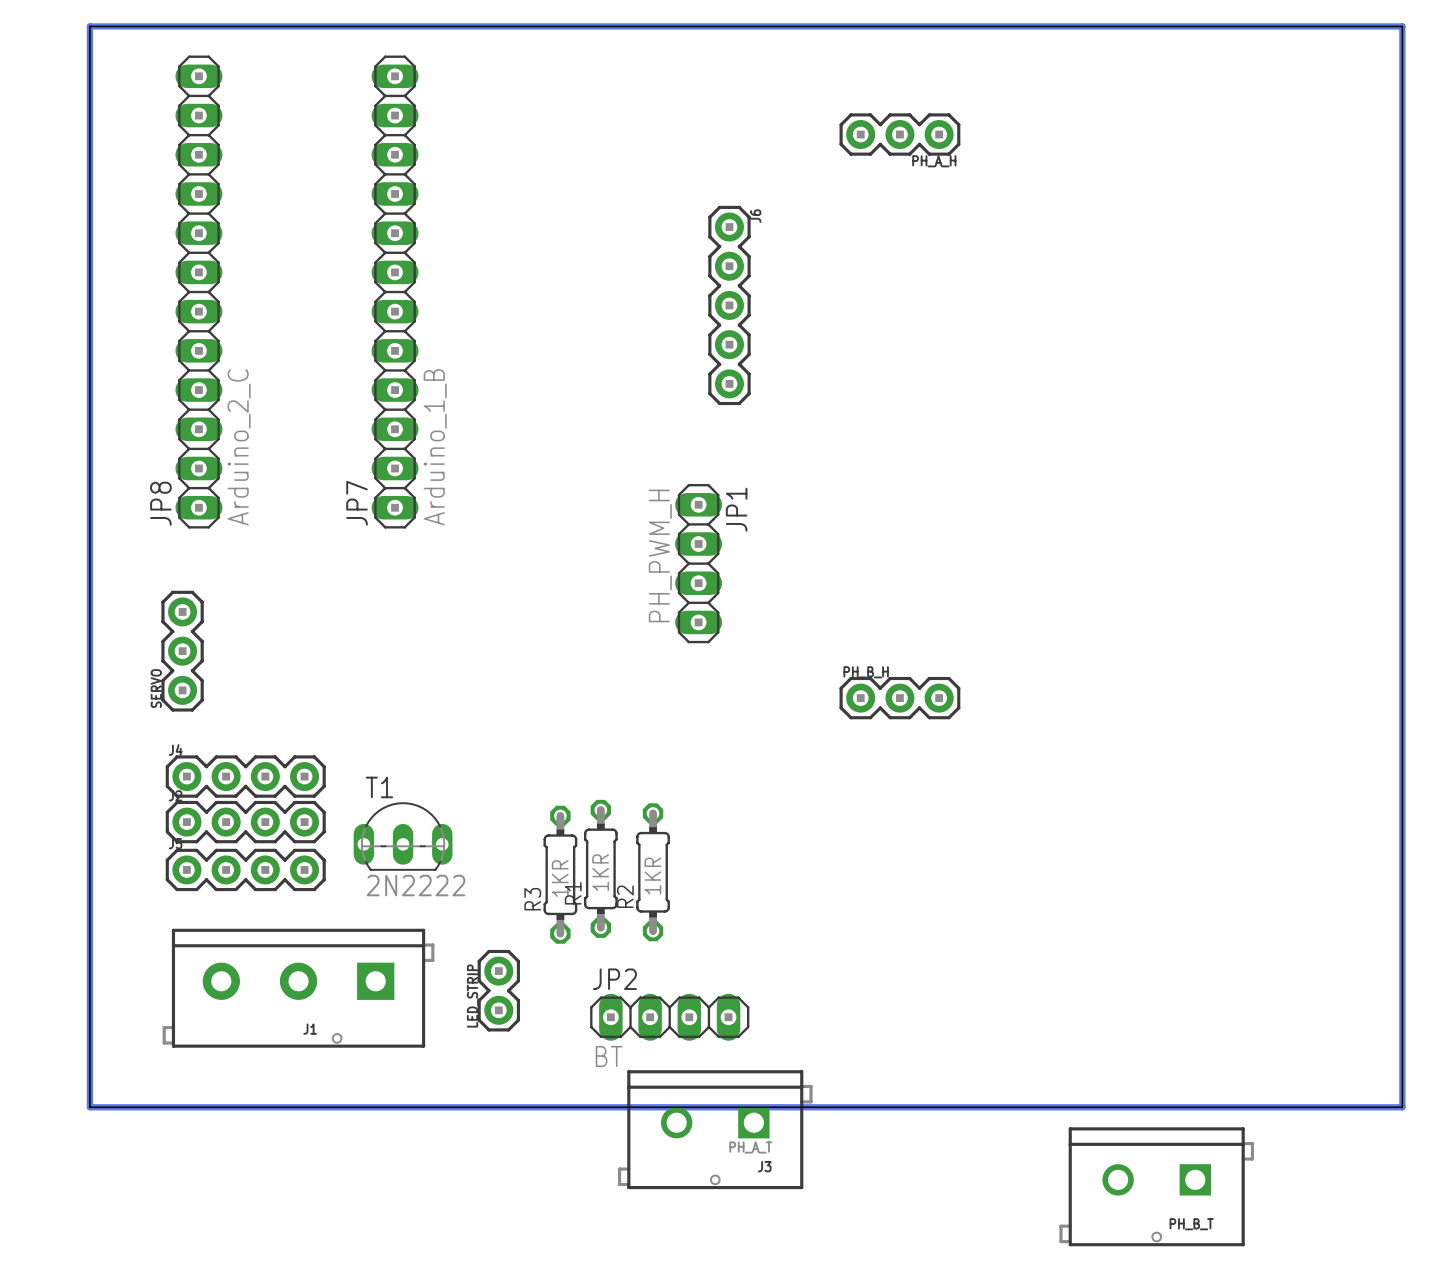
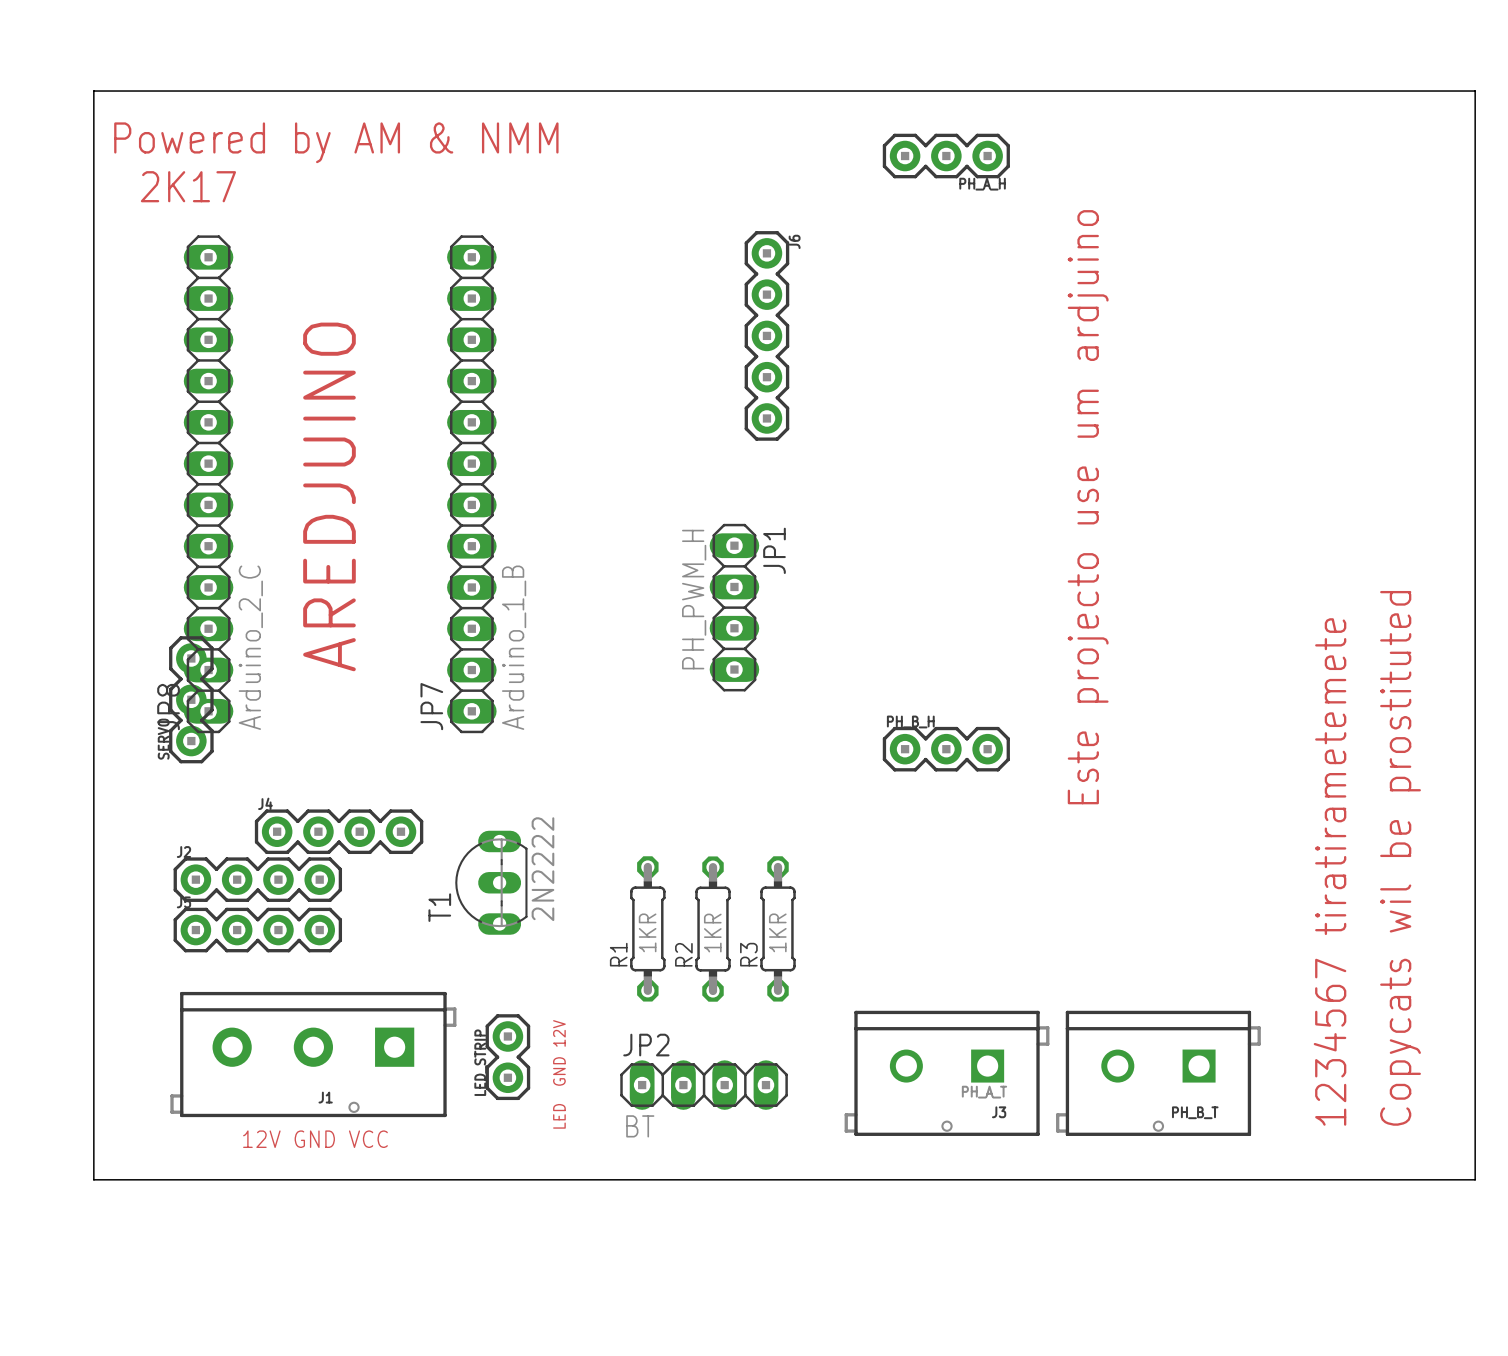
bottom track: (89, 26) (89, 1107) (1402, 1107) (1402, 26) (89, 26) -> none
board edge: (89, 72) (89, 26) (1402, 26) (1402, 72) -> (93, 91) (1475, 91)
text: none -> Powered by AM & NMM (336, 142)
text: none -> 2K17 (188, 186)
JP8 position: (198, 292) -> (208, 484)
JP7 position: (395, 292) -> (471, 484)
text: none -> AREDJUINO (329, 496)
text: none -> Este projecto use um ardjuino (1088, 507)
J4 position: (245, 776) -> (339, 831)
text: none -> Copycats wil be prostituted (1400, 858)
text: none -> 1234567 tiratirametemete (1330, 871)
T1 rotation: 0° (403, 836) -> 90° counterclockwise (491, 882)
T1 position: (403, 836) -> (491, 882)
R1 position: (600, 868) -> (647, 928)
R2 position: (653, 872) -> (713, 929)
R3 position: (560, 874) -> (778, 928)
LED_STRIP position: (498, 990) -> (507, 1057)
text: none -> LED GND 12V (559, 1074)
text: none -> 12V GND VCC (315, 1139)
J3 position: (715, 1129) -> (947, 1073)
PH_B_T position: (1156, 1186) -> (1158, 1073)

